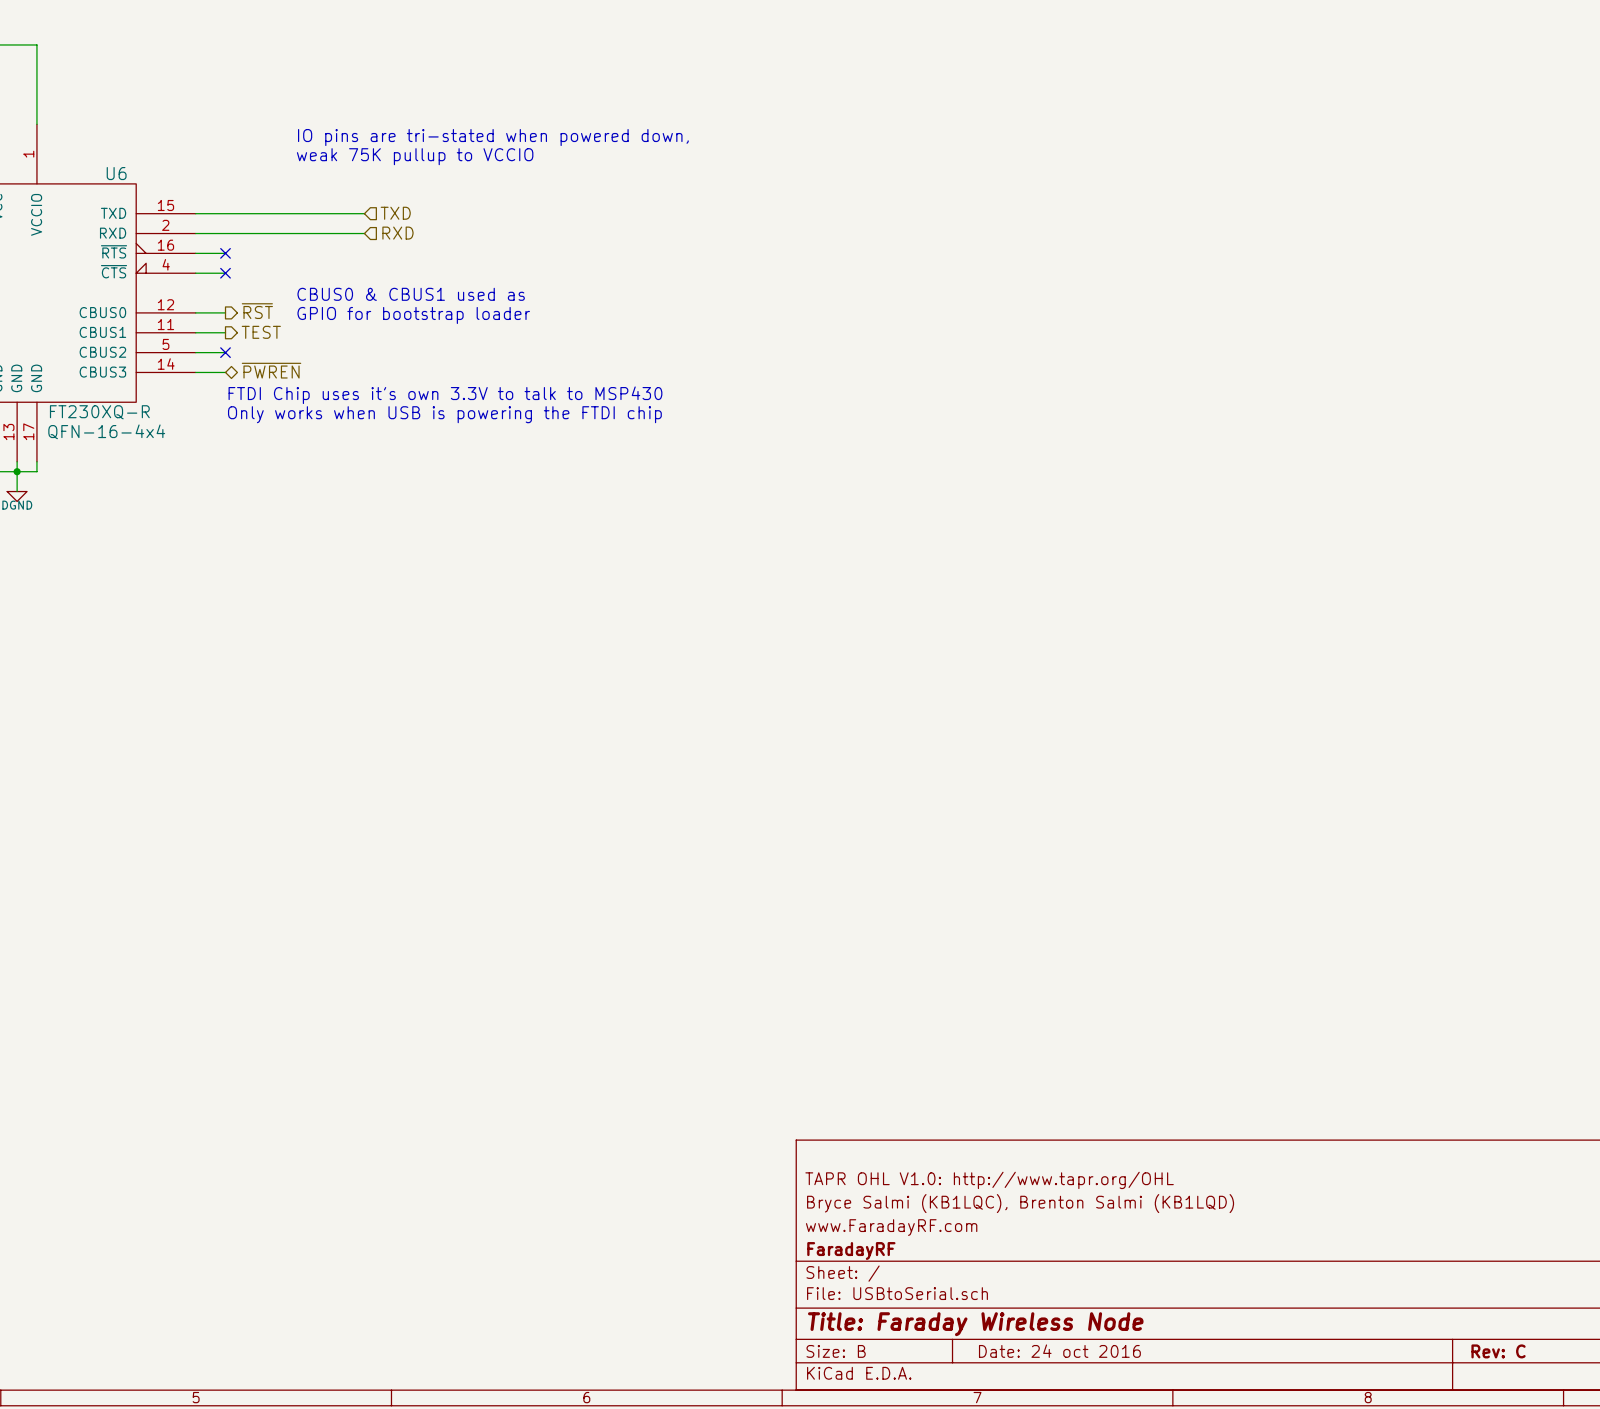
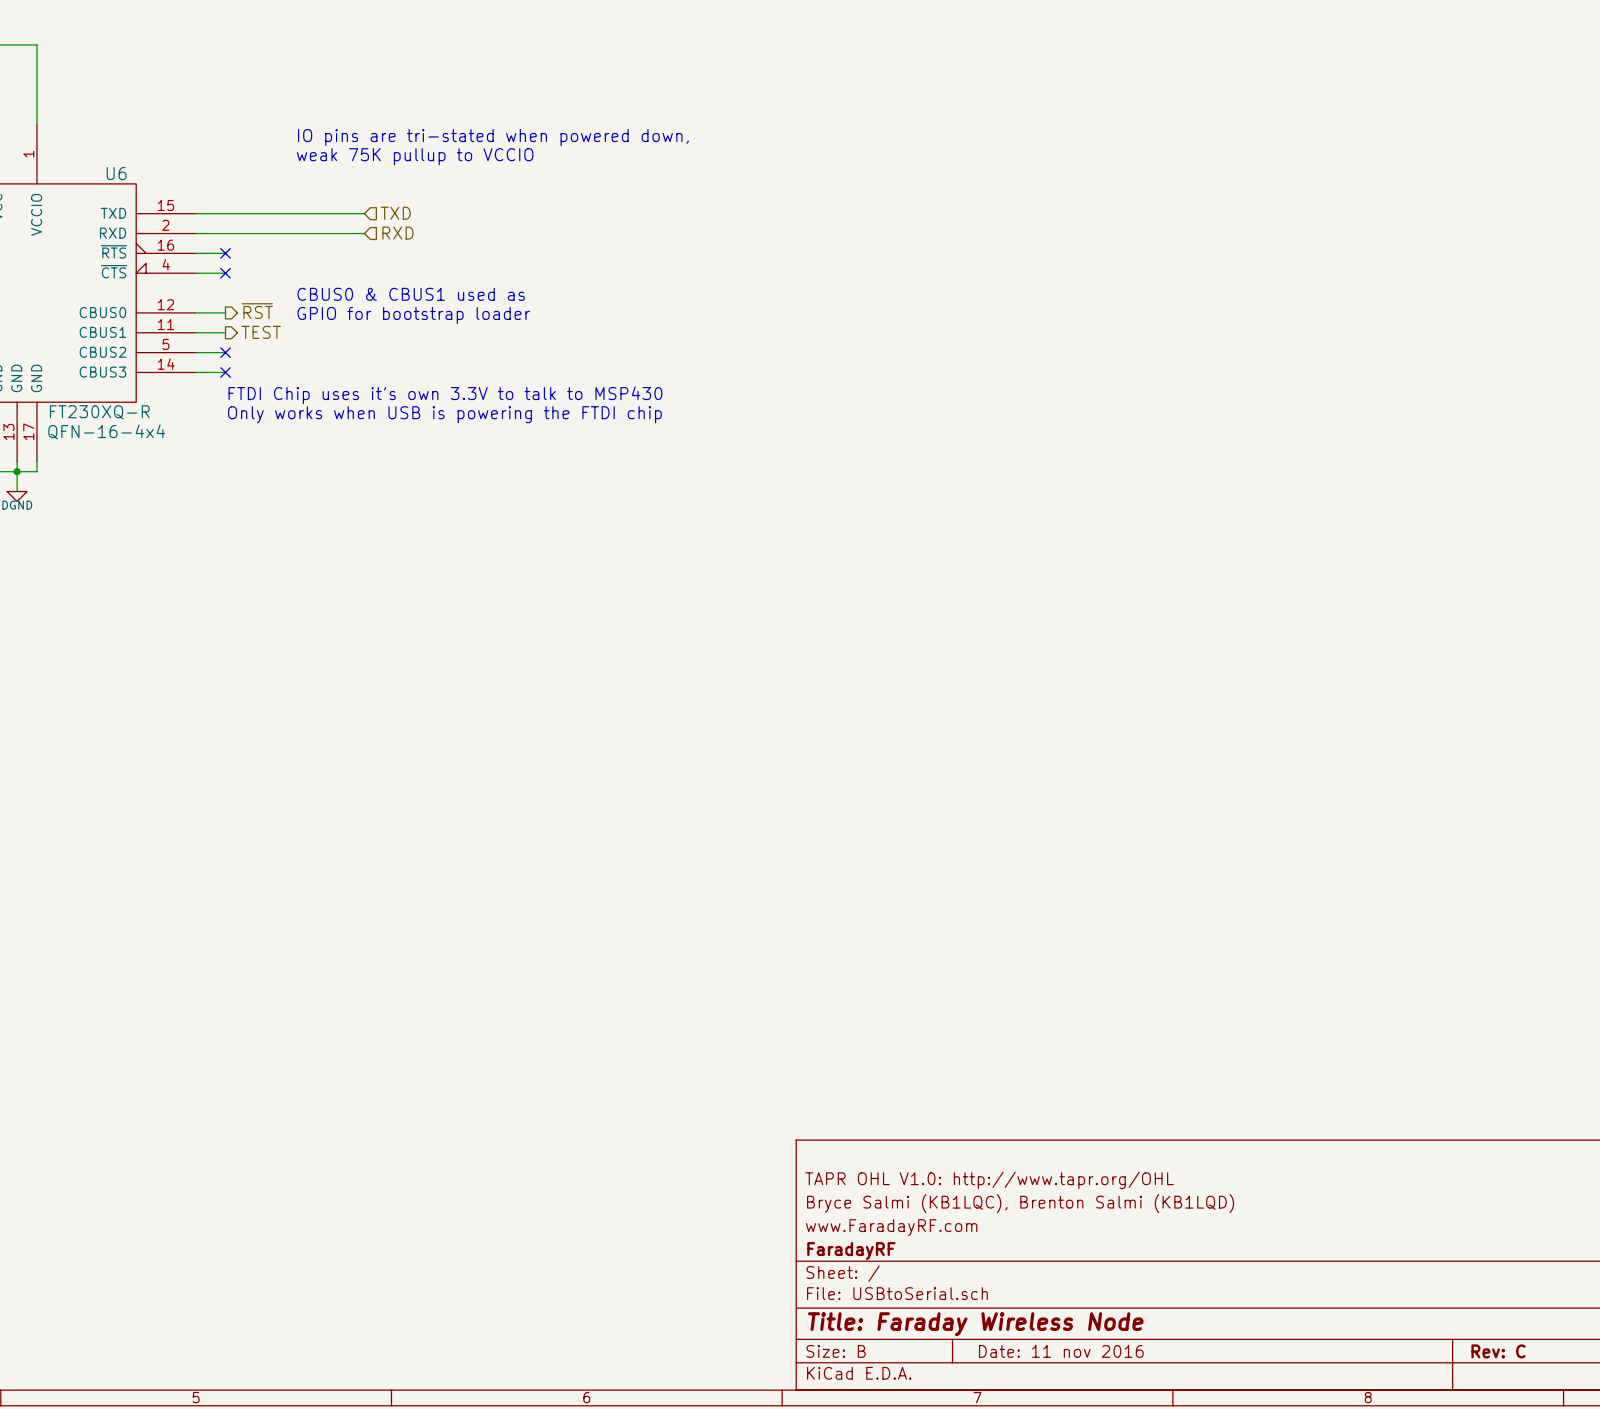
hierarchical label: ~{PWREN} (271, 370) -> none
no-connect mark: none -> (225, 372)
title block: Date: 24 oct 2016 (1059, 1351) -> Date: 11 nov 2016 (1061, 1351)

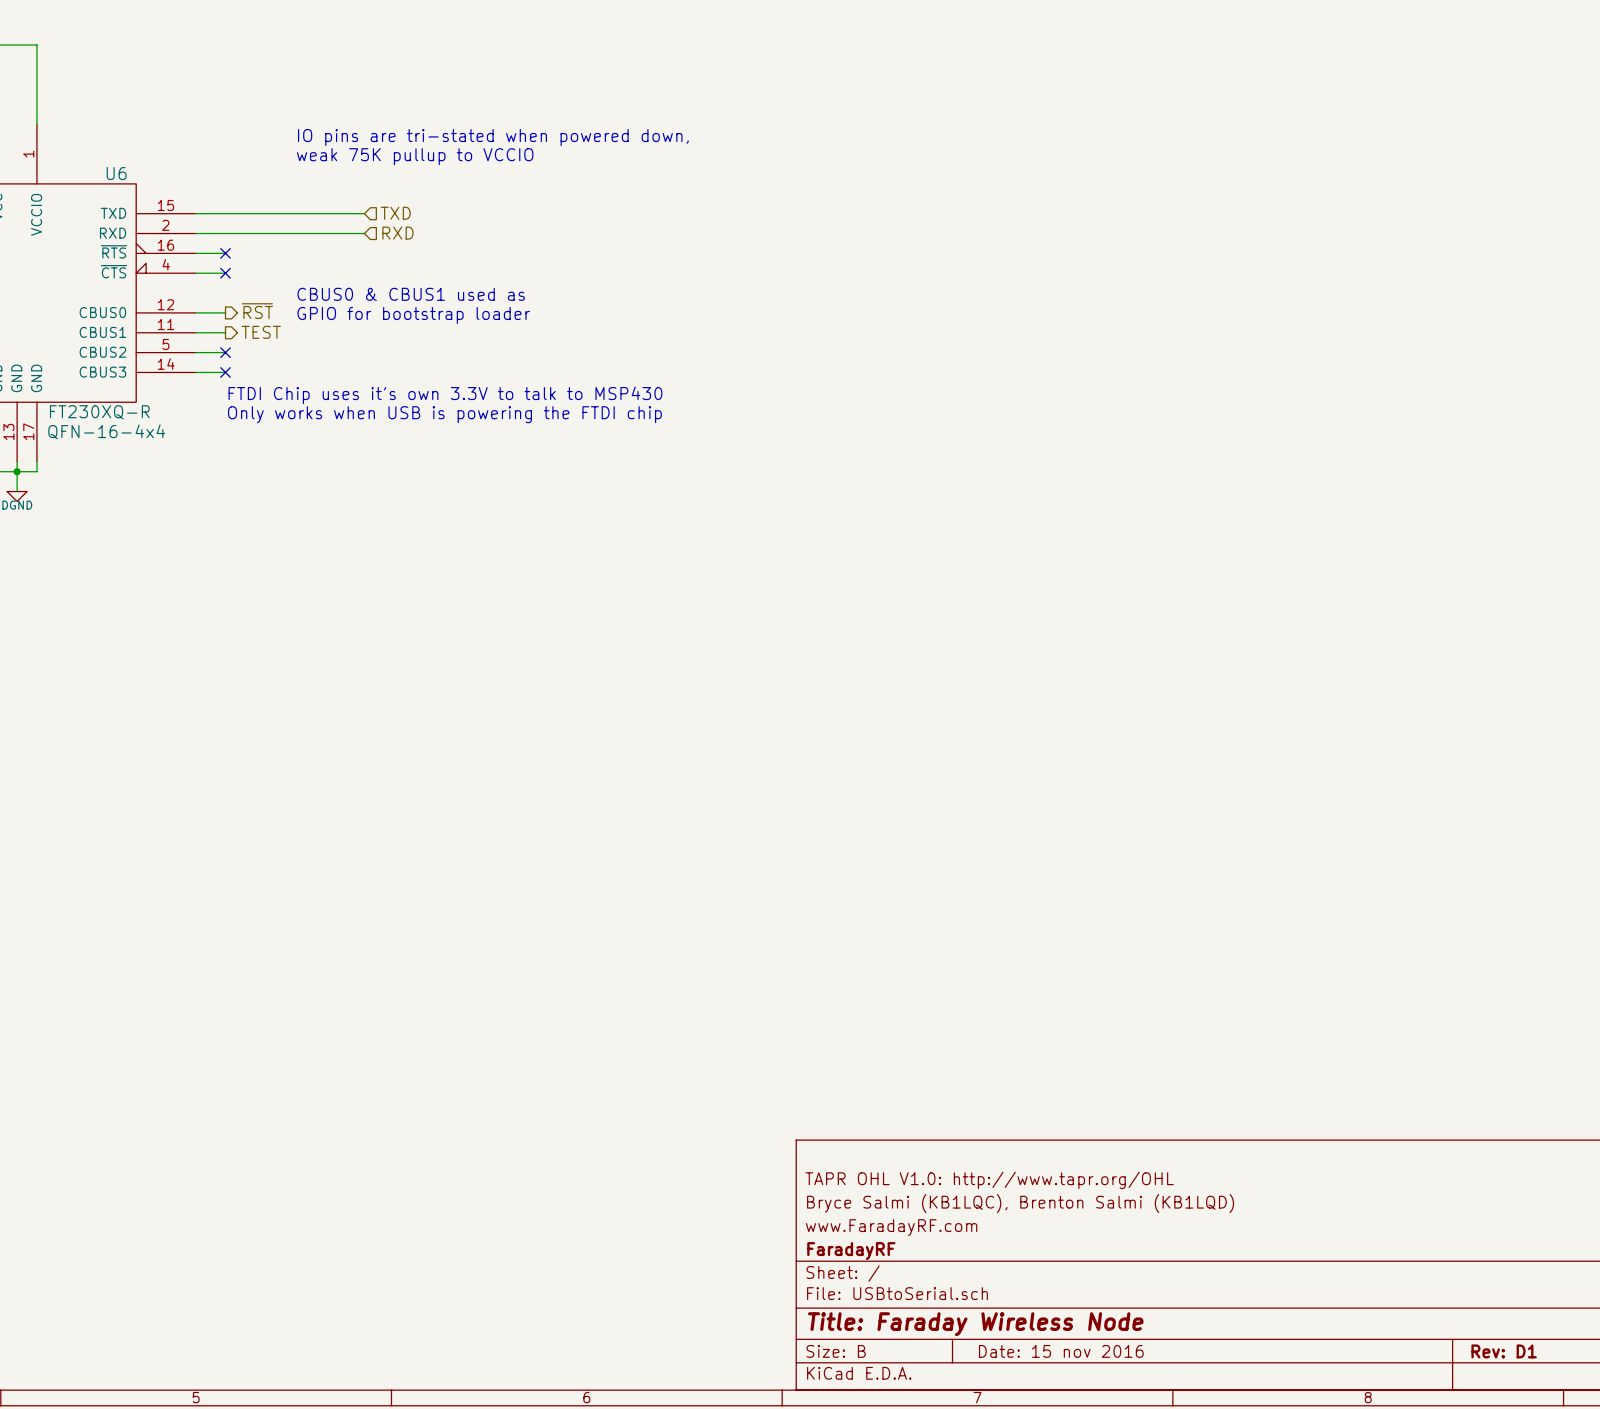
title block: Date: 11 nov 2016 (1061, 1351) -> Date: 15 nov 2016 (1061, 1351)
title block: Rev: C (1498, 1351) -> Rev: D1 (1504, 1351)

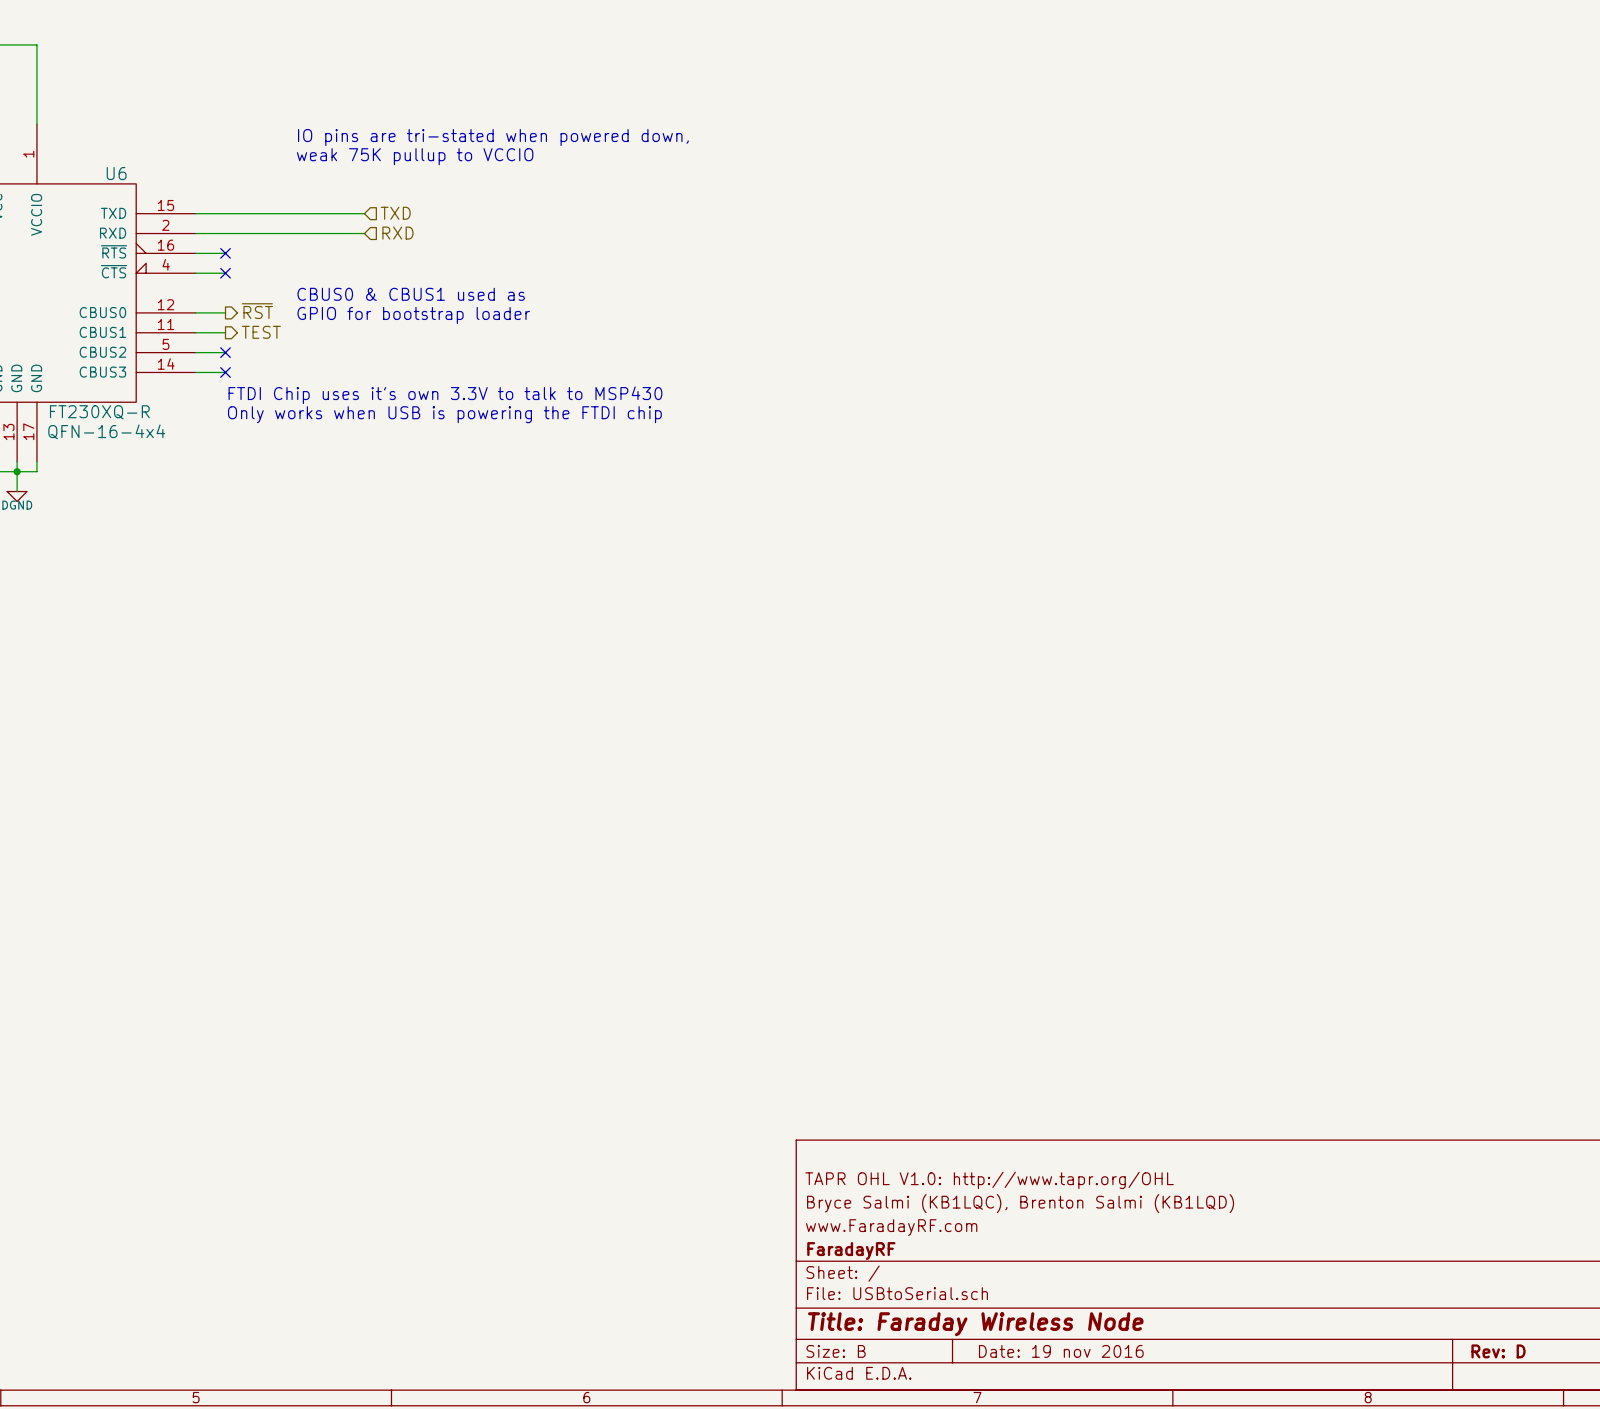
title block: Date: 15 nov 2016 (1061, 1351) -> Date: 19 nov 2016 (1061, 1351)
title block: Rev: D1 (1504, 1351) -> Rev: D (1498, 1351)

